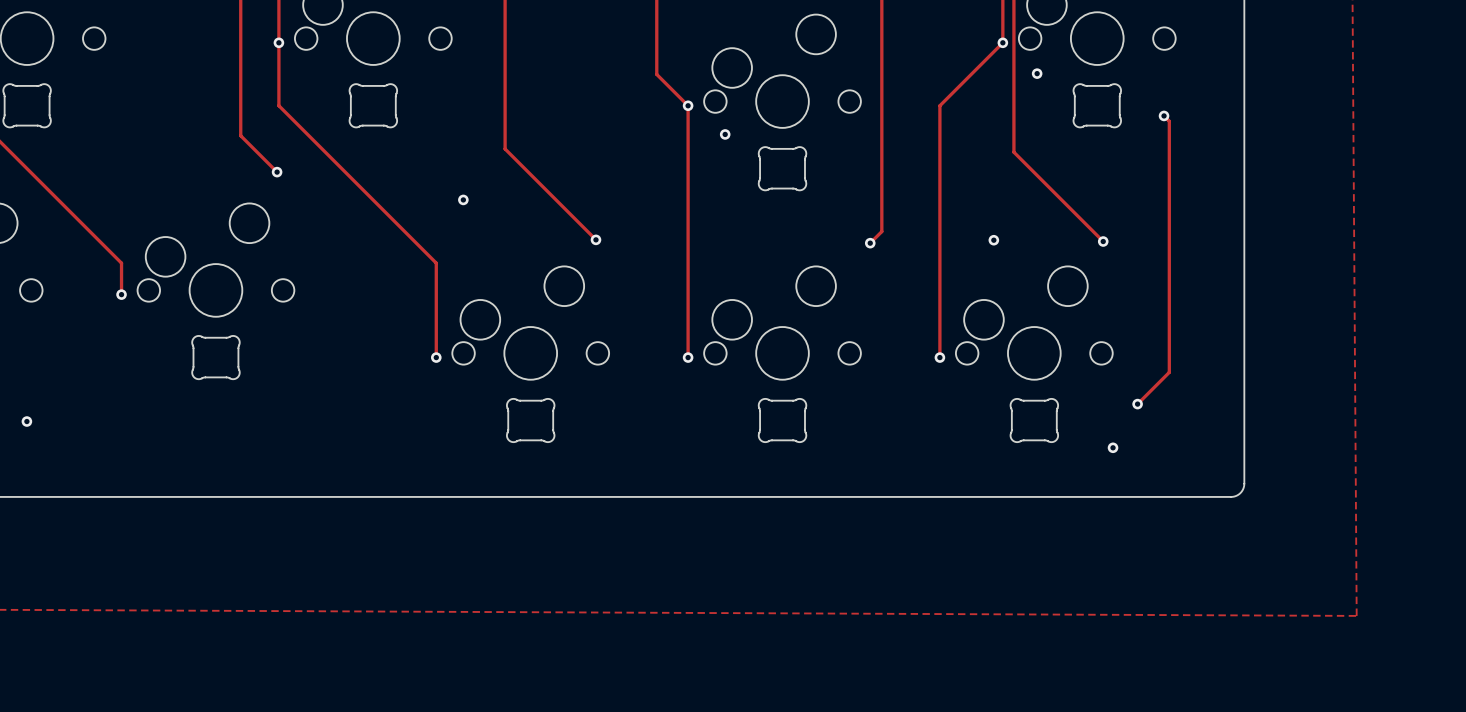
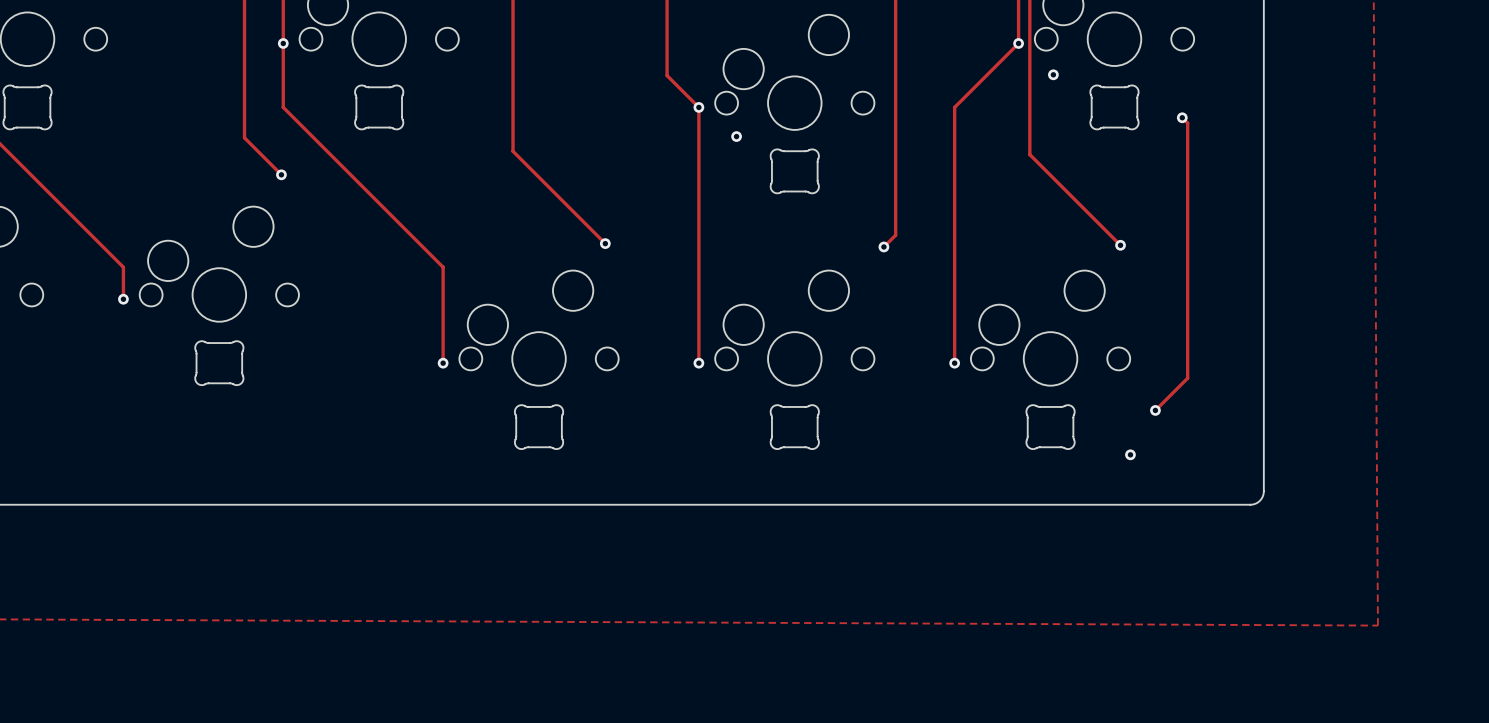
via: (463, 199) -> none
via: (993, 240) -> none
via: (26, 421) -> none

